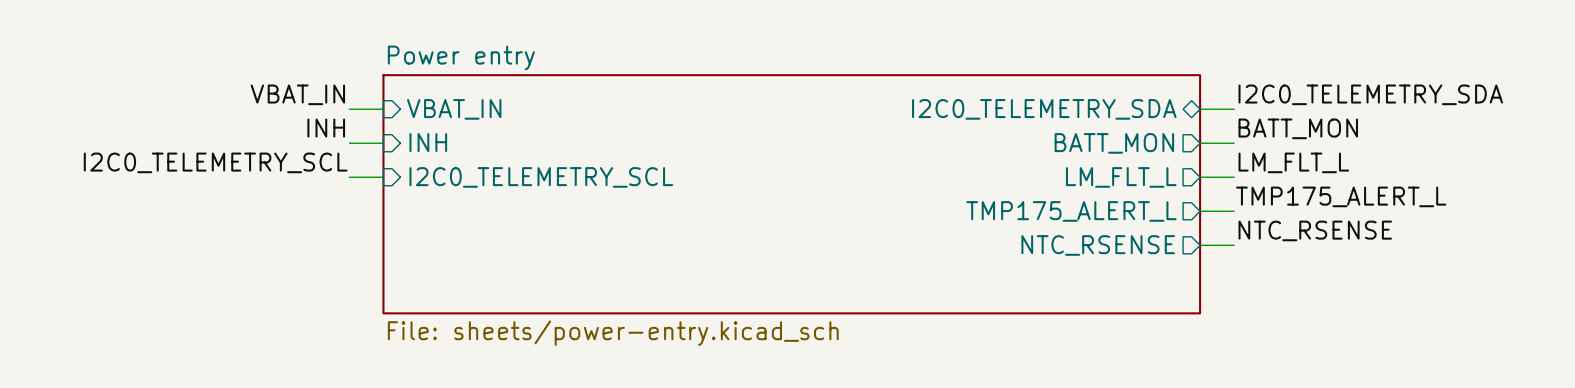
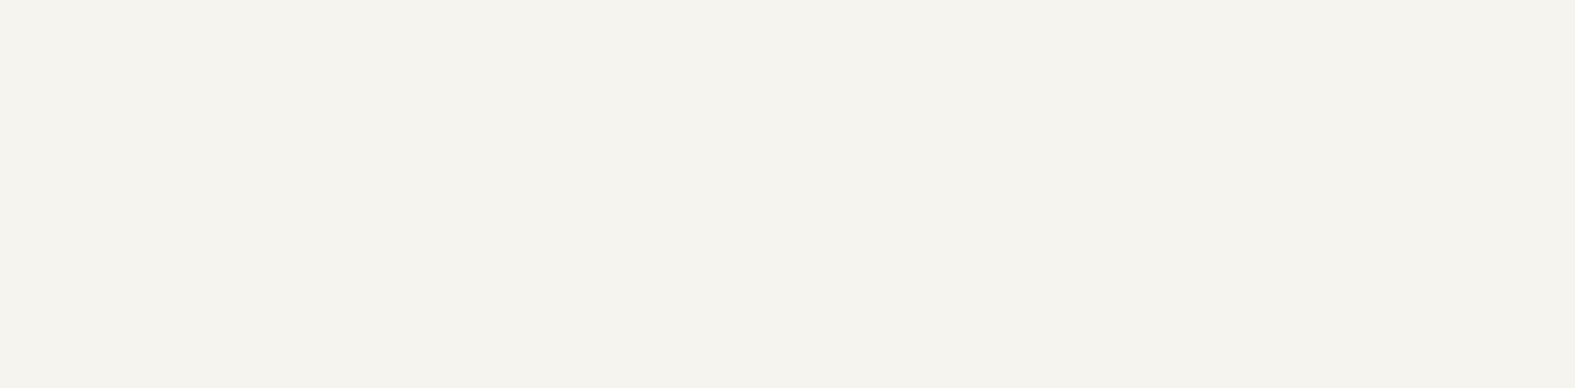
label: VBAT_IN (297, 94) -> none
label: I2C0_TELEMETRY_SDA (1370, 94) -> none
wire: (349, 109) (383, 109) -> none
sheet pin: VBAT_IN (454, 109) -> none
sheet pin: I2C0_TELEMETRY_SDA (1044, 109) -> none
wire: (1200, 109) (1234, 109) -> none
label: INH (326, 128) -> none
label: BATT_MON (1298, 128) -> none
sheet pin: INH (428, 142) -> none
wire: (349, 143) (383, 143) -> none
sheet pin: BATT_MON (1114, 143) -> none
wire: (1200, 143) (1234, 143) -> none
label: I2C0_TELEMETRY_SCL (215, 162) -> none
label: LM_FLT_L (1293, 162) -> none
wire: (349, 177) (383, 177) -> none
sheet pin: I2C0_TELEMETRY_SCL (541, 177) -> none
sheet pin: LM_FLT_L (1121, 177) -> none
wire: (1200, 177) (1234, 177) -> none
sheet Power entry: File: sheets/power-entry.kicad_sch (791, 194) -> none
label: TMP175_ALERT_L (1341, 196) -> none
sheet pin: TMP175_ALERT_L (1071, 211) -> none
wire: (1200, 211) (1234, 211) -> none
label: NTC_RSENSE (1315, 230) -> none
sheet pin: NTC_RSENSE (1098, 245) -> none
wire: (1200, 245) (1234, 245) -> none

